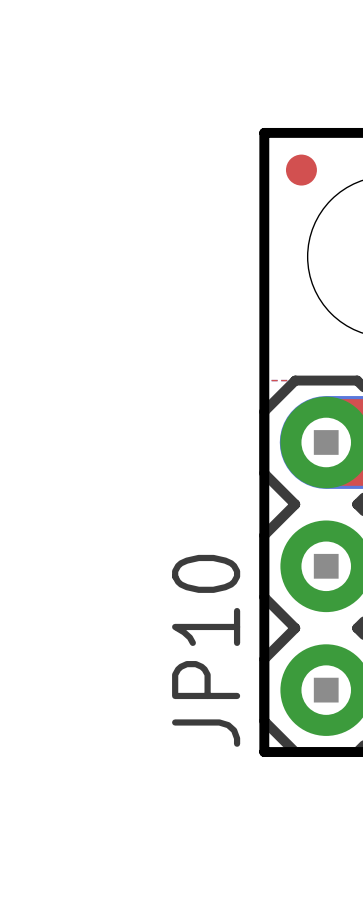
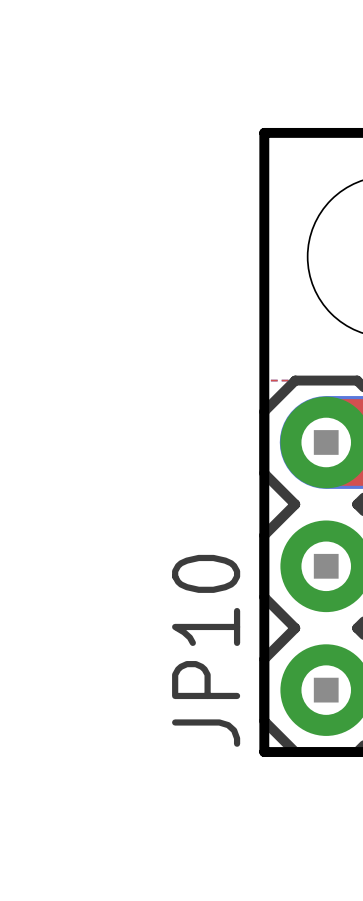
part: (301, 170) -> none

